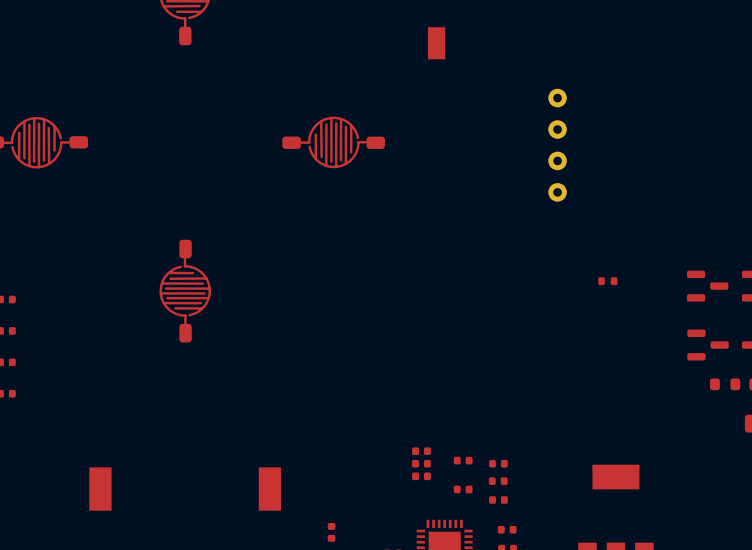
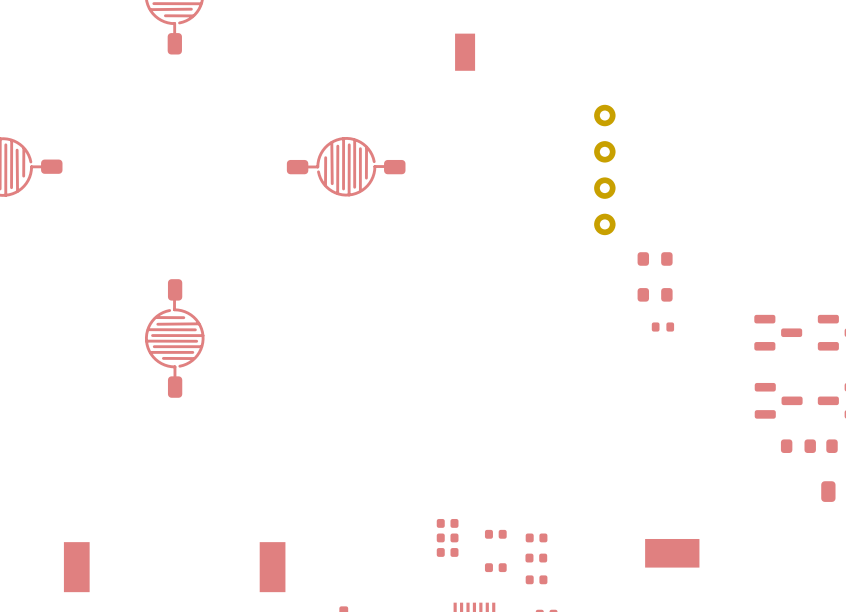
part: none -> (655, 258)
part: none -> (655, 294)

